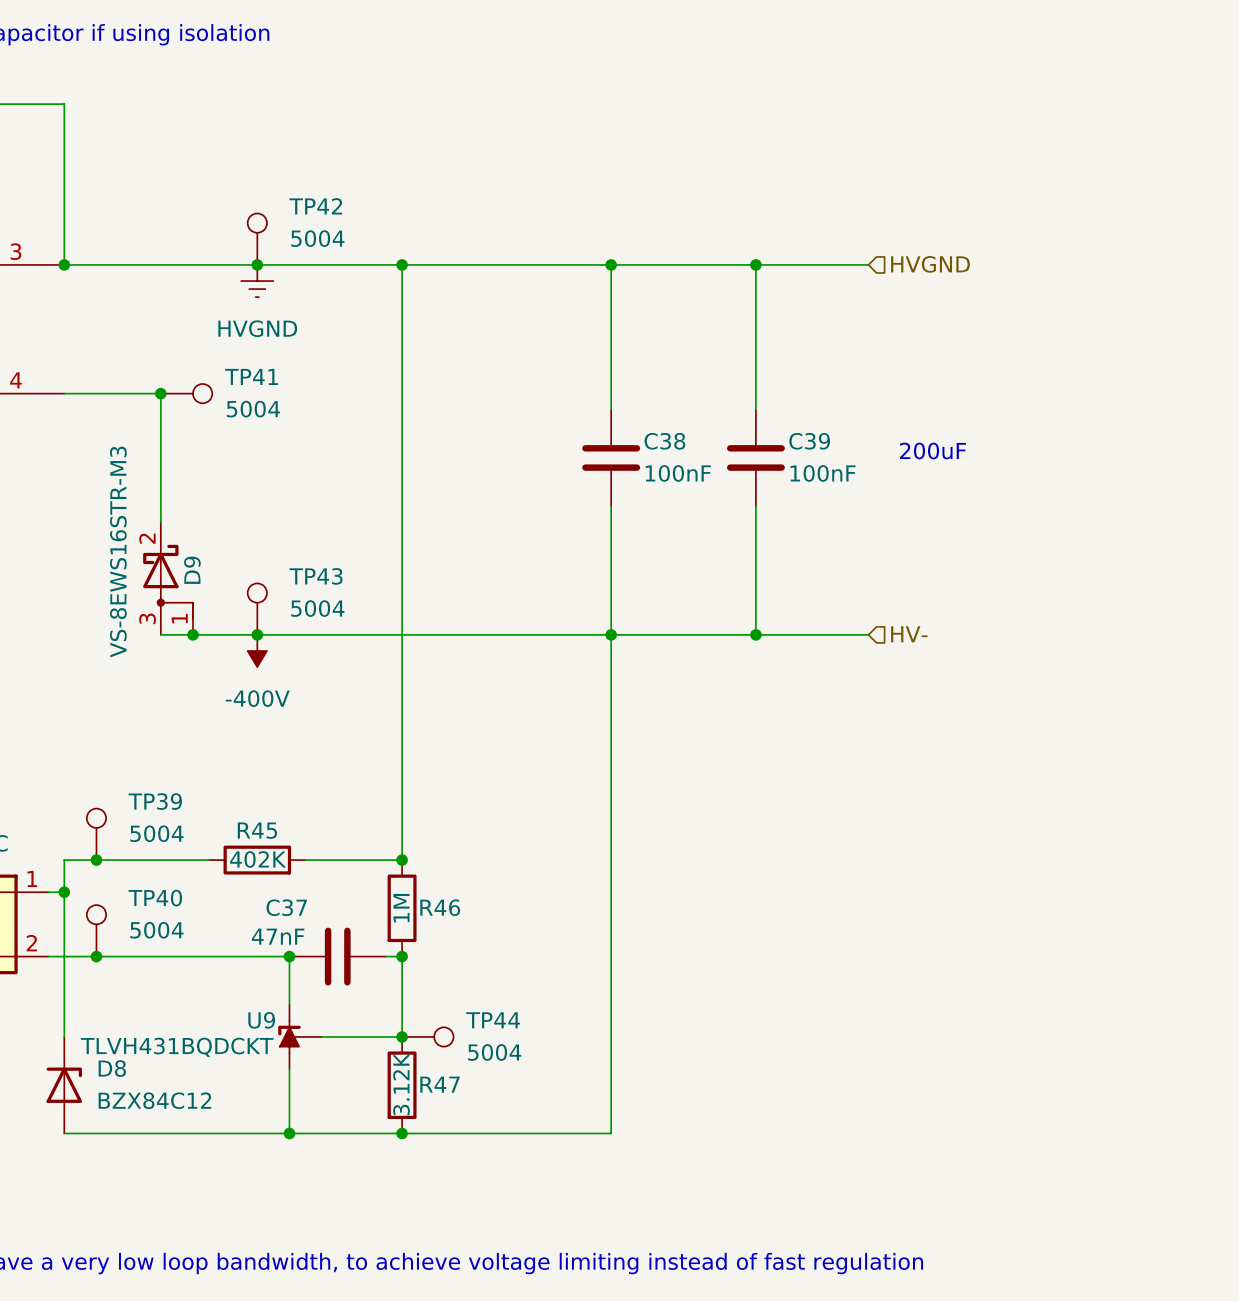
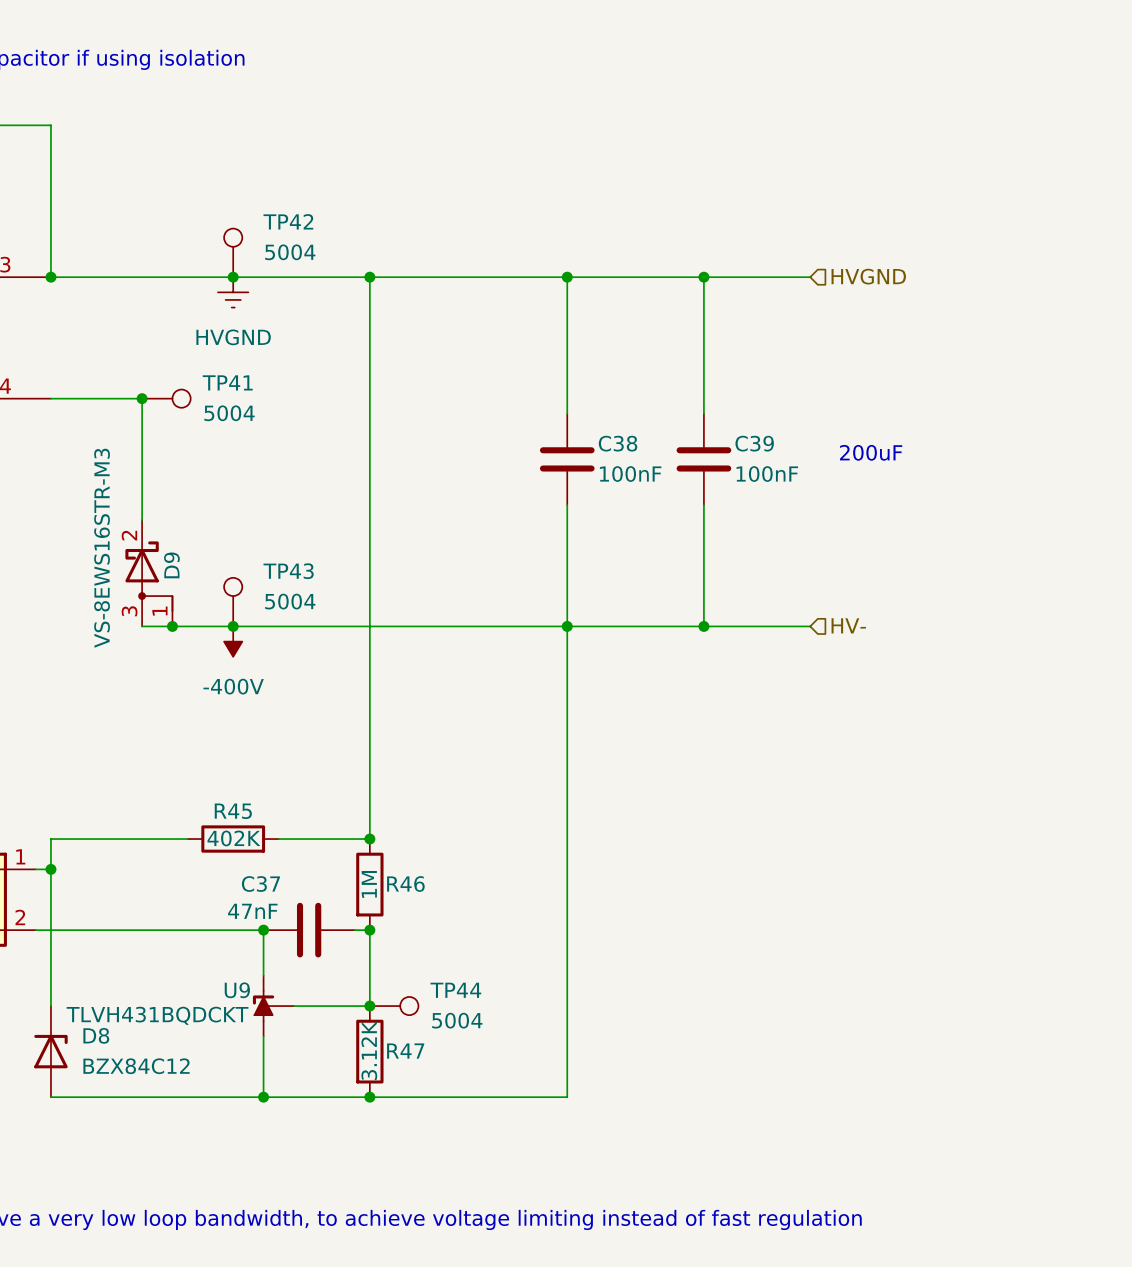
TP39: 5004 (96, 834) -> none
junction: (96, 860) -> none
TP40: 5004 (96, 930) -> none
junction: (96, 956) -> none

